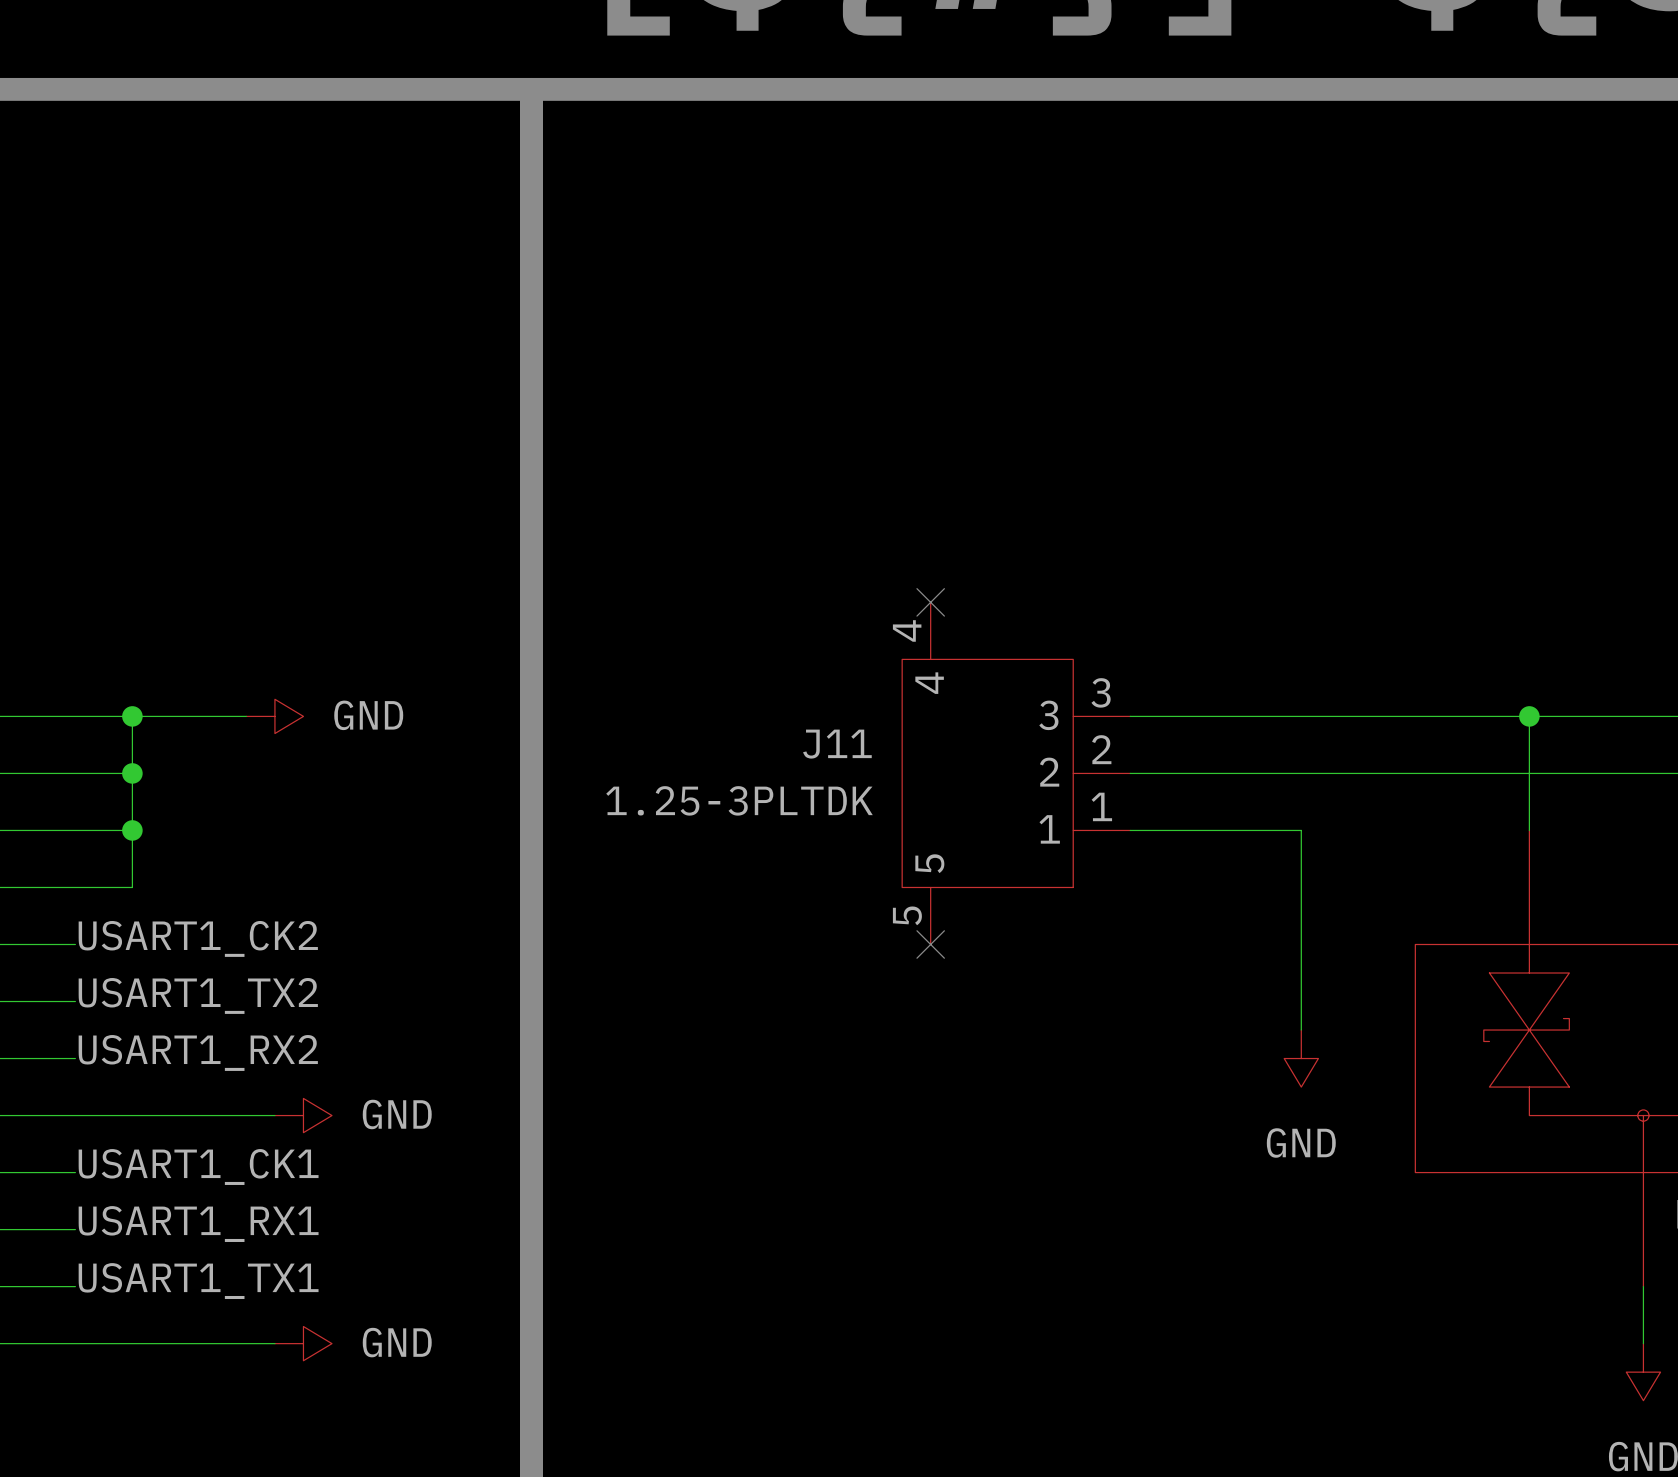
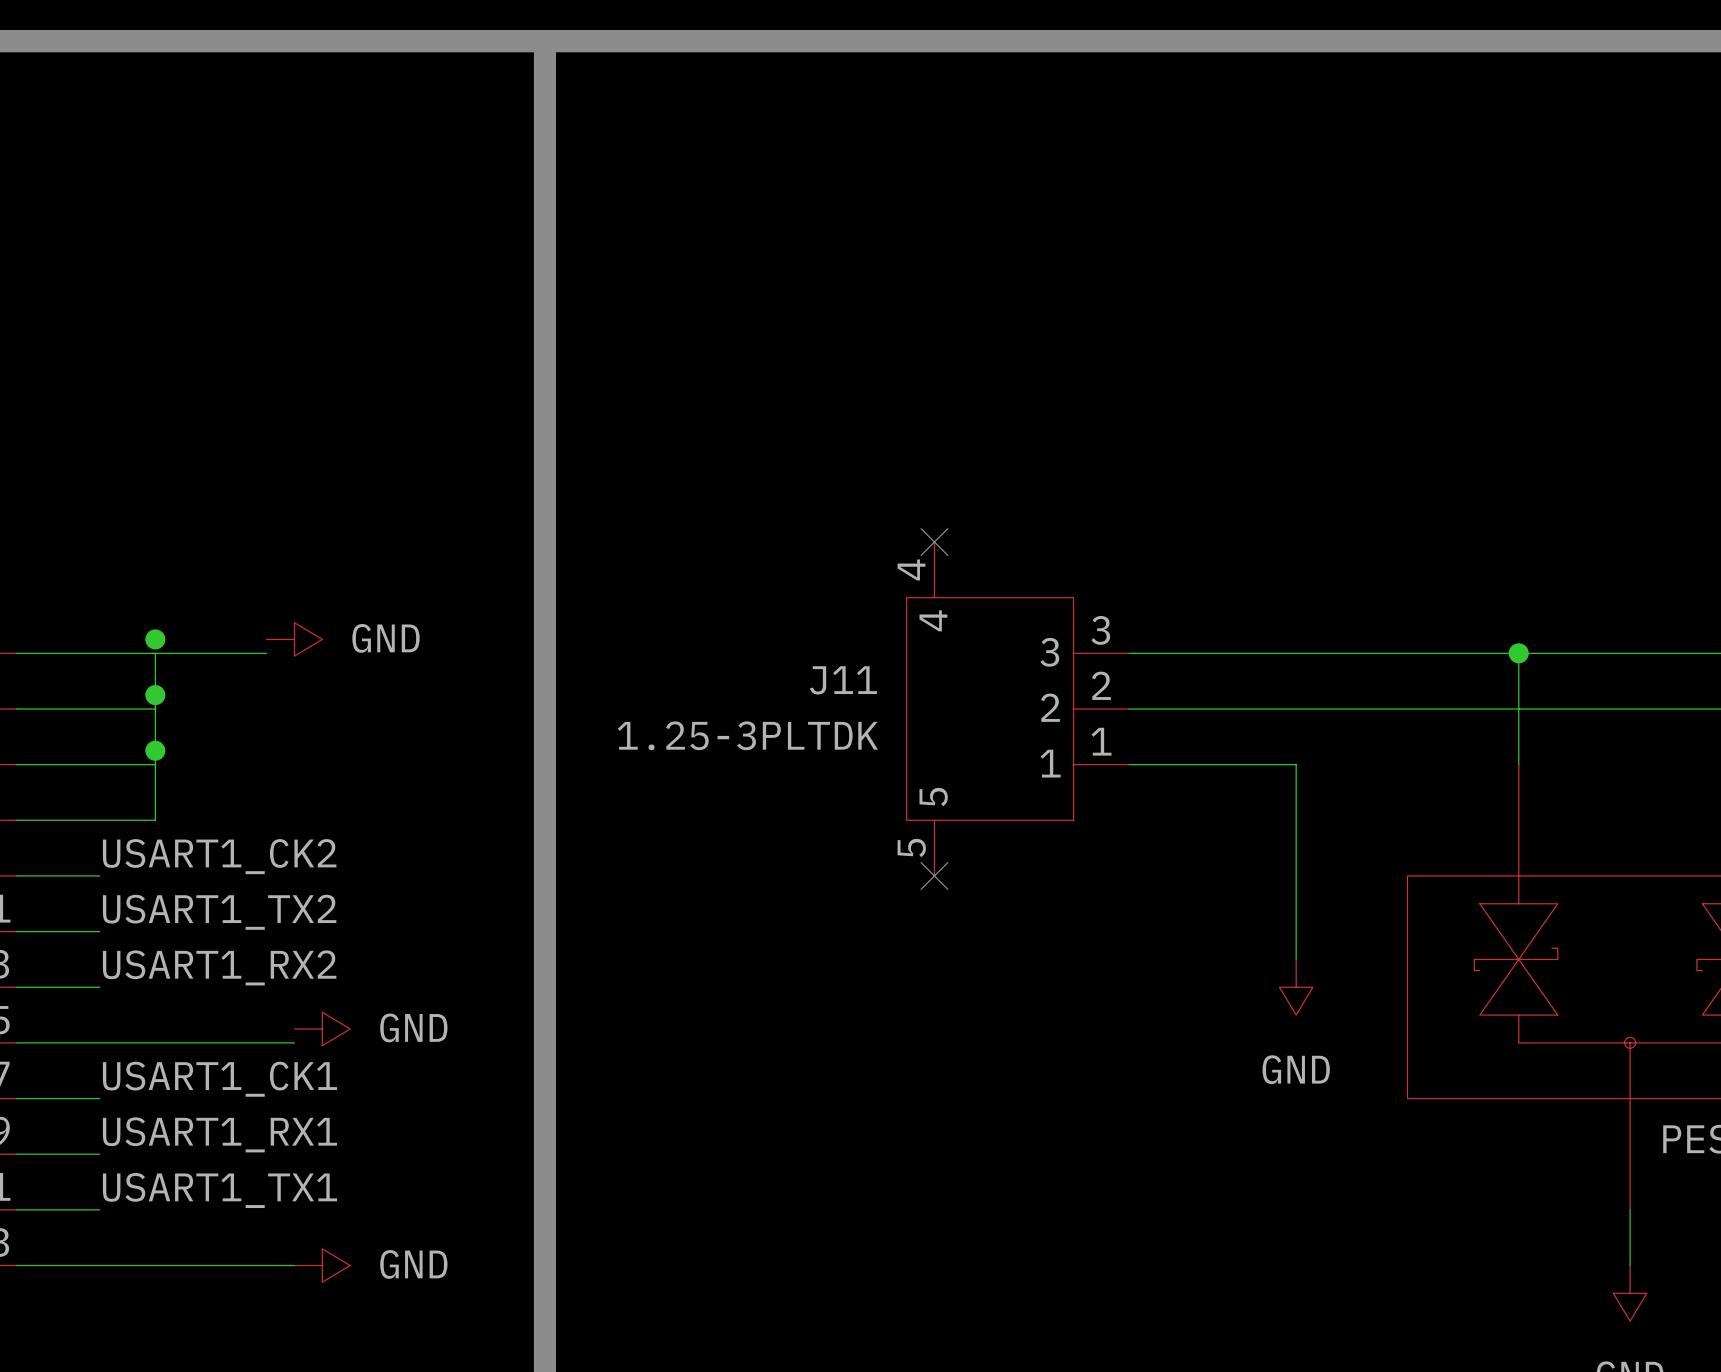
junction position: (132, 716) -> (155, 639)
power symbol position: GND (274, 716) -> GND (294, 639)
junction position: (132, 773) -> (155, 695)
junction position: (132, 830) -> (155, 750)
label position: USART1_CK2 (198, 938) -> USART1_CK2 (219, 856)
label position: USART1_TX2 (198, 995) -> USART1_TX2 (219, 912)
label position: USART1_RX2 (198, 1052) -> USART1_RX2 (219, 967)
power symbol position: GND (303, 1115) -> GND (322, 1028)
label position: USART1_CK1 (198, 1167) -> USART1_CK1 (219, 1079)
label position: USART1_RX1 (198, 1224) -> USART1_RX1 (219, 1134)
label position: USART1_TX1 (198, 1281) -> USART1_TX1 (219, 1190)

